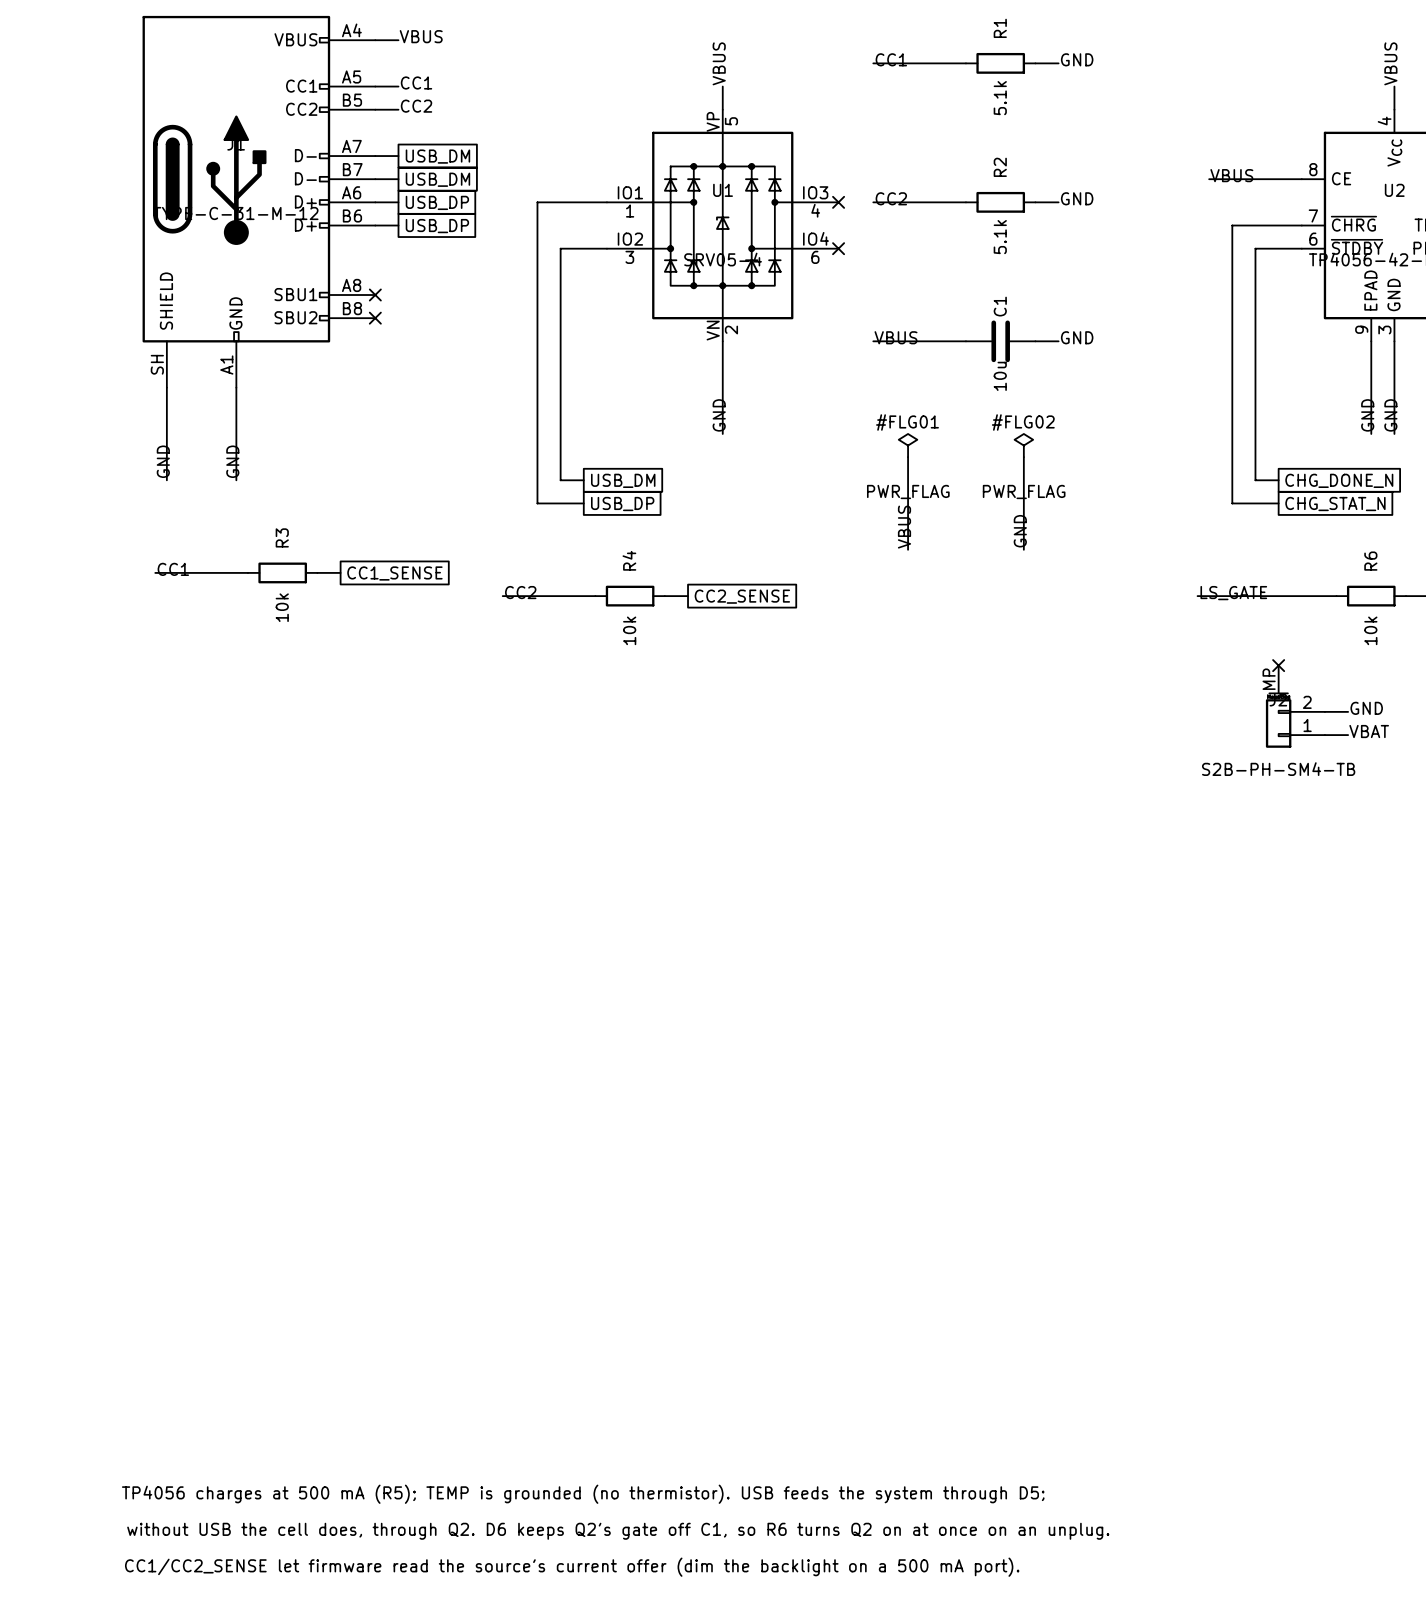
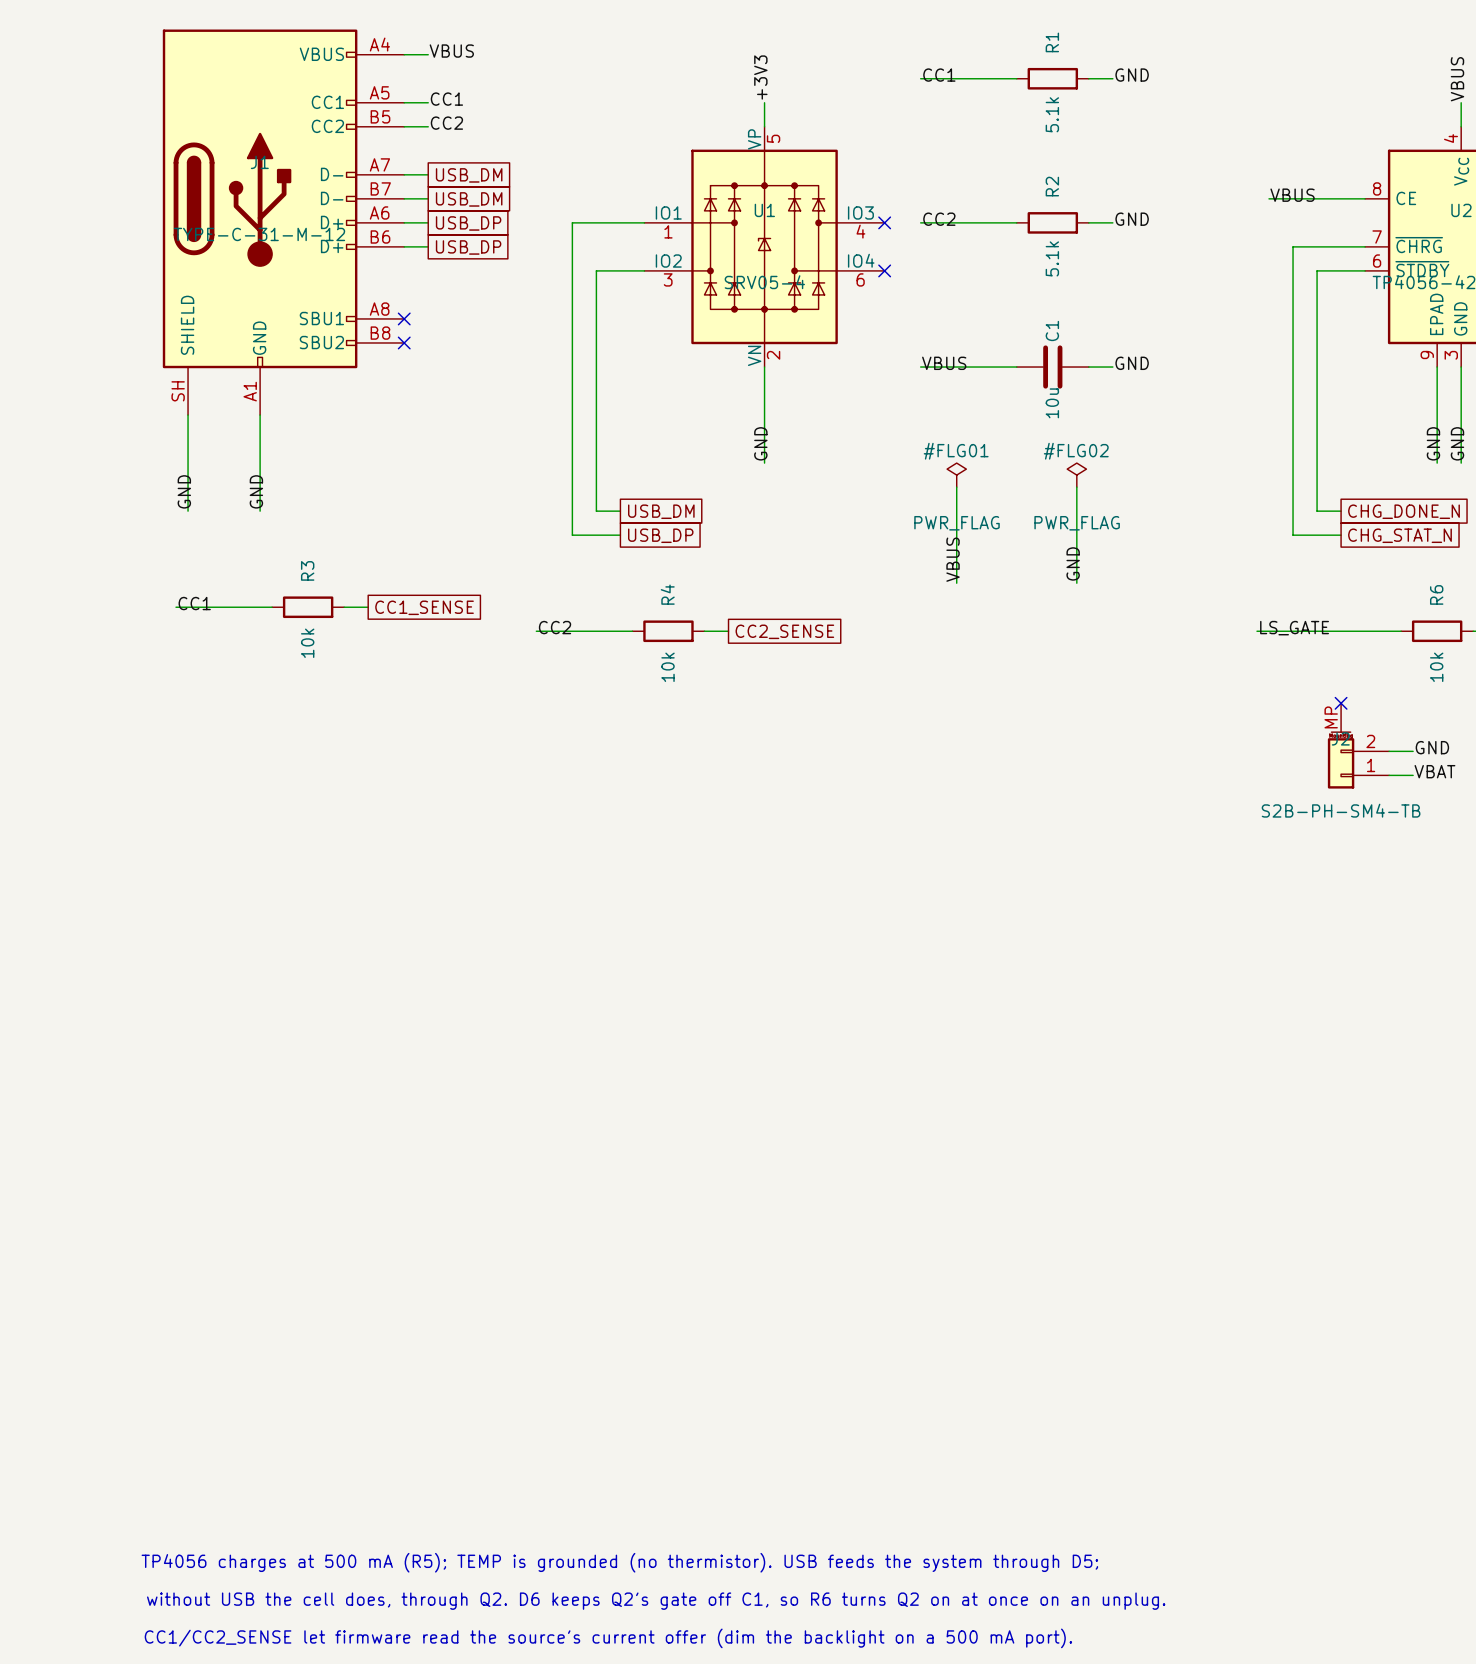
label: VBUS (719, 63) -> +3V3 (760, 77)

